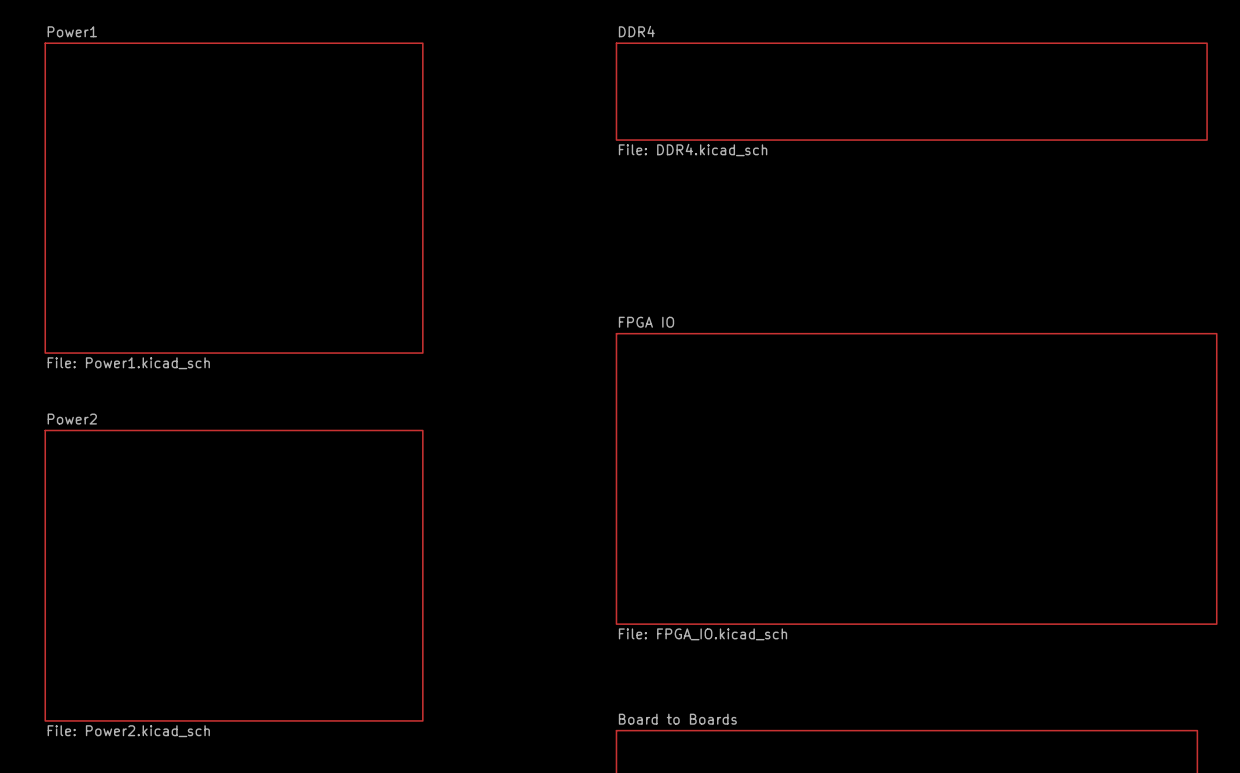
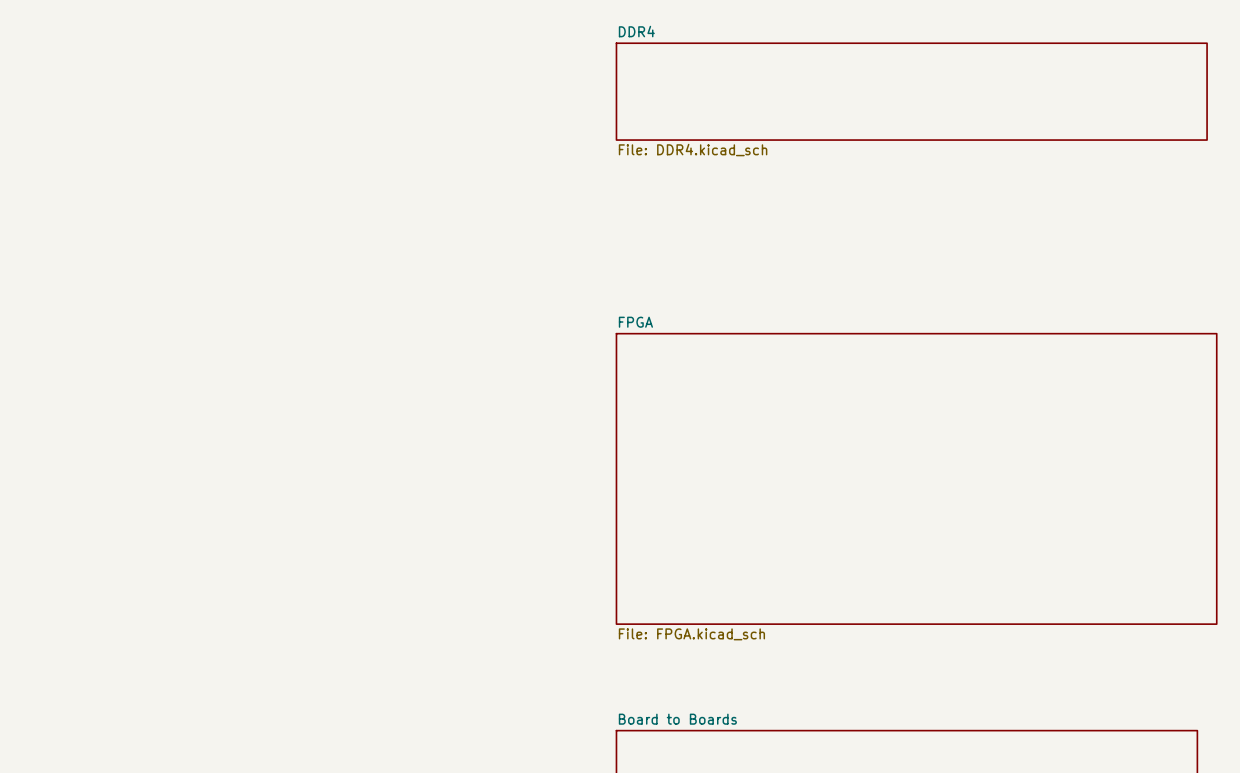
sheet Power1: File: Power1.kicad_sch (234, 198) -> none
sheet FPGA IO name: FPGA IO (646, 322) -> FPGA (635, 322)
sheet Power2: File: Power2.kicad_sch (234, 575) -> none
sheet FPGA IO value: File: FPGA_IO.kicad_sch (702, 634) -> File: FPGA.kicad_sch (691, 634)

